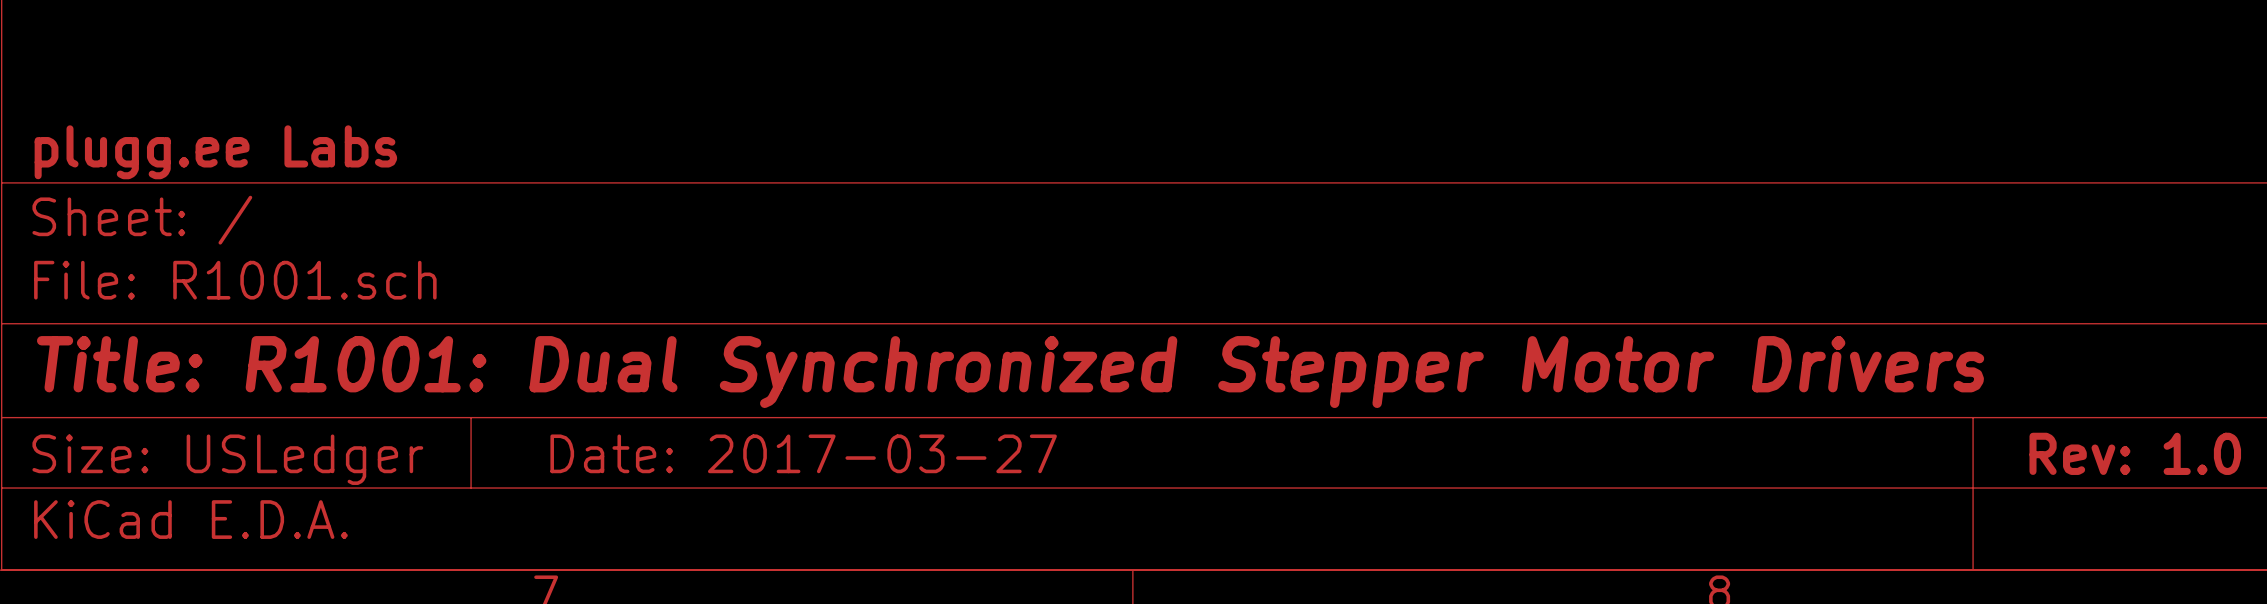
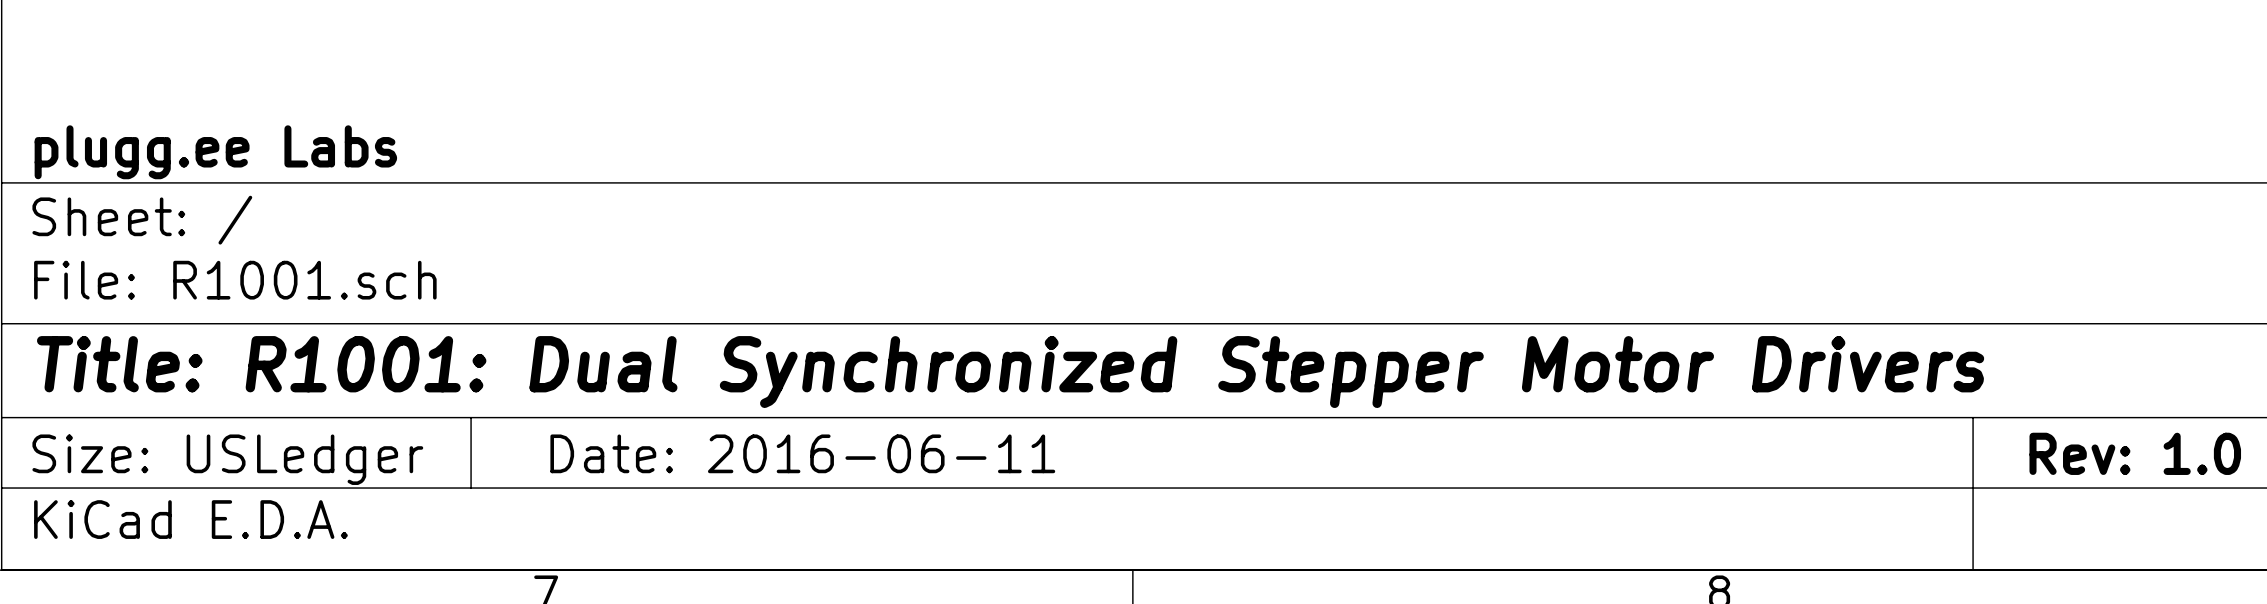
title block: Date: 2017-03-27 (803, 453) -> Date: 2016-06-11 (802, 453)

